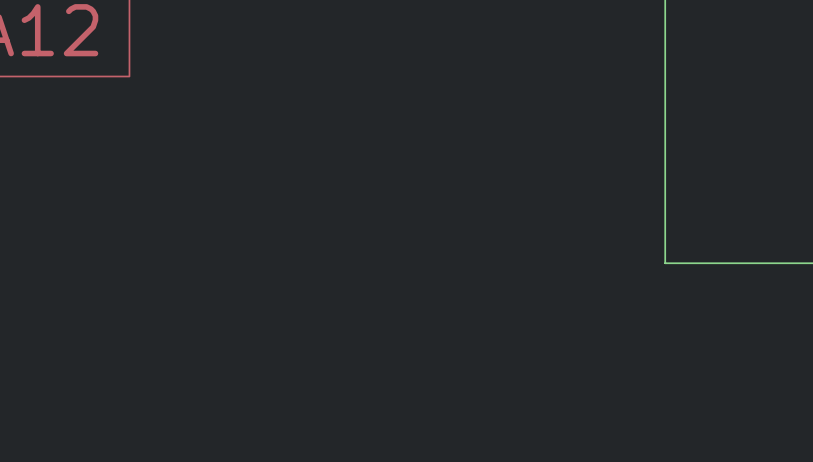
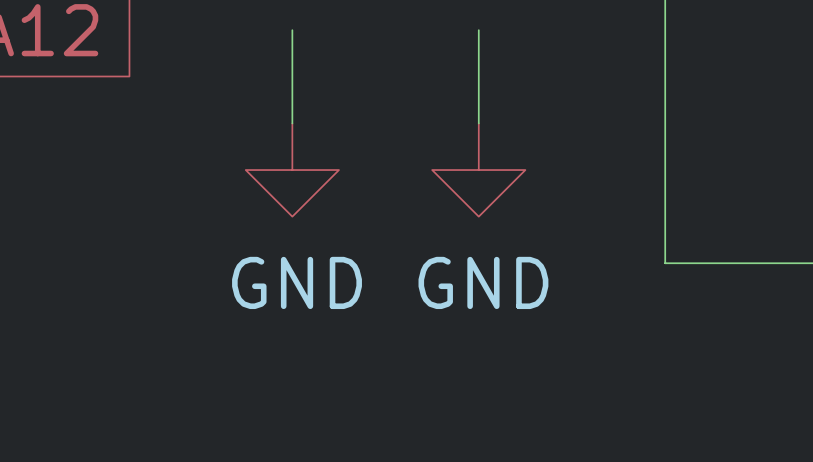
wire: none -> (292, 30) (292, 123)
wire: none -> (478, 30) (478, 123)
power symbol: none -> GND (292, 170)
power symbol: none -> GND (478, 170)

